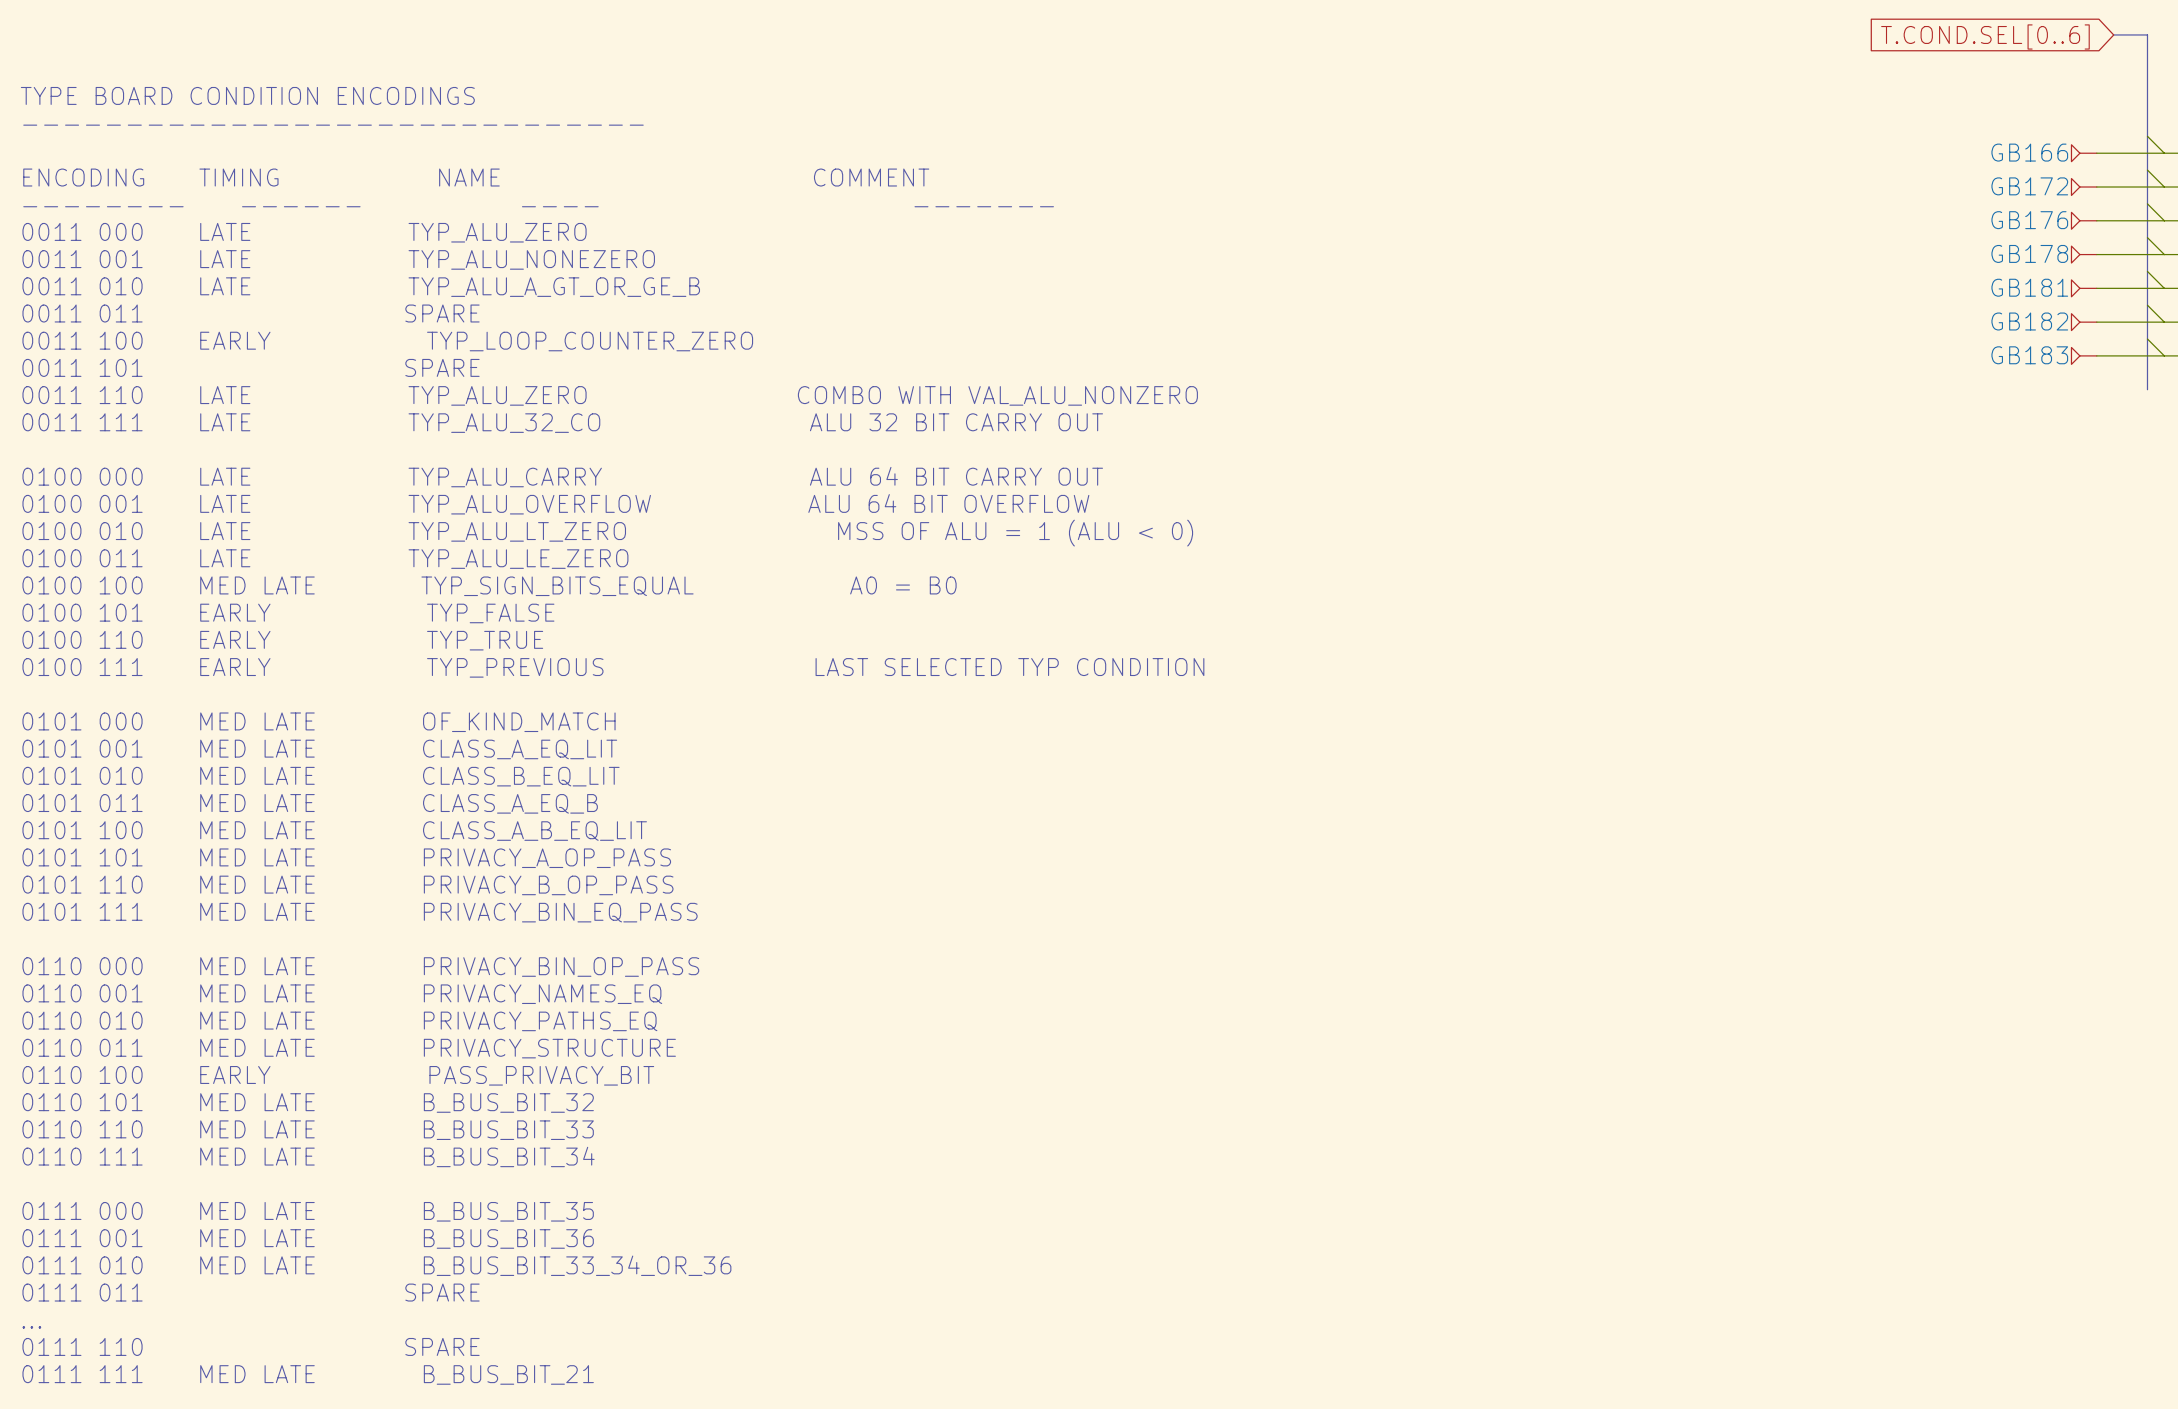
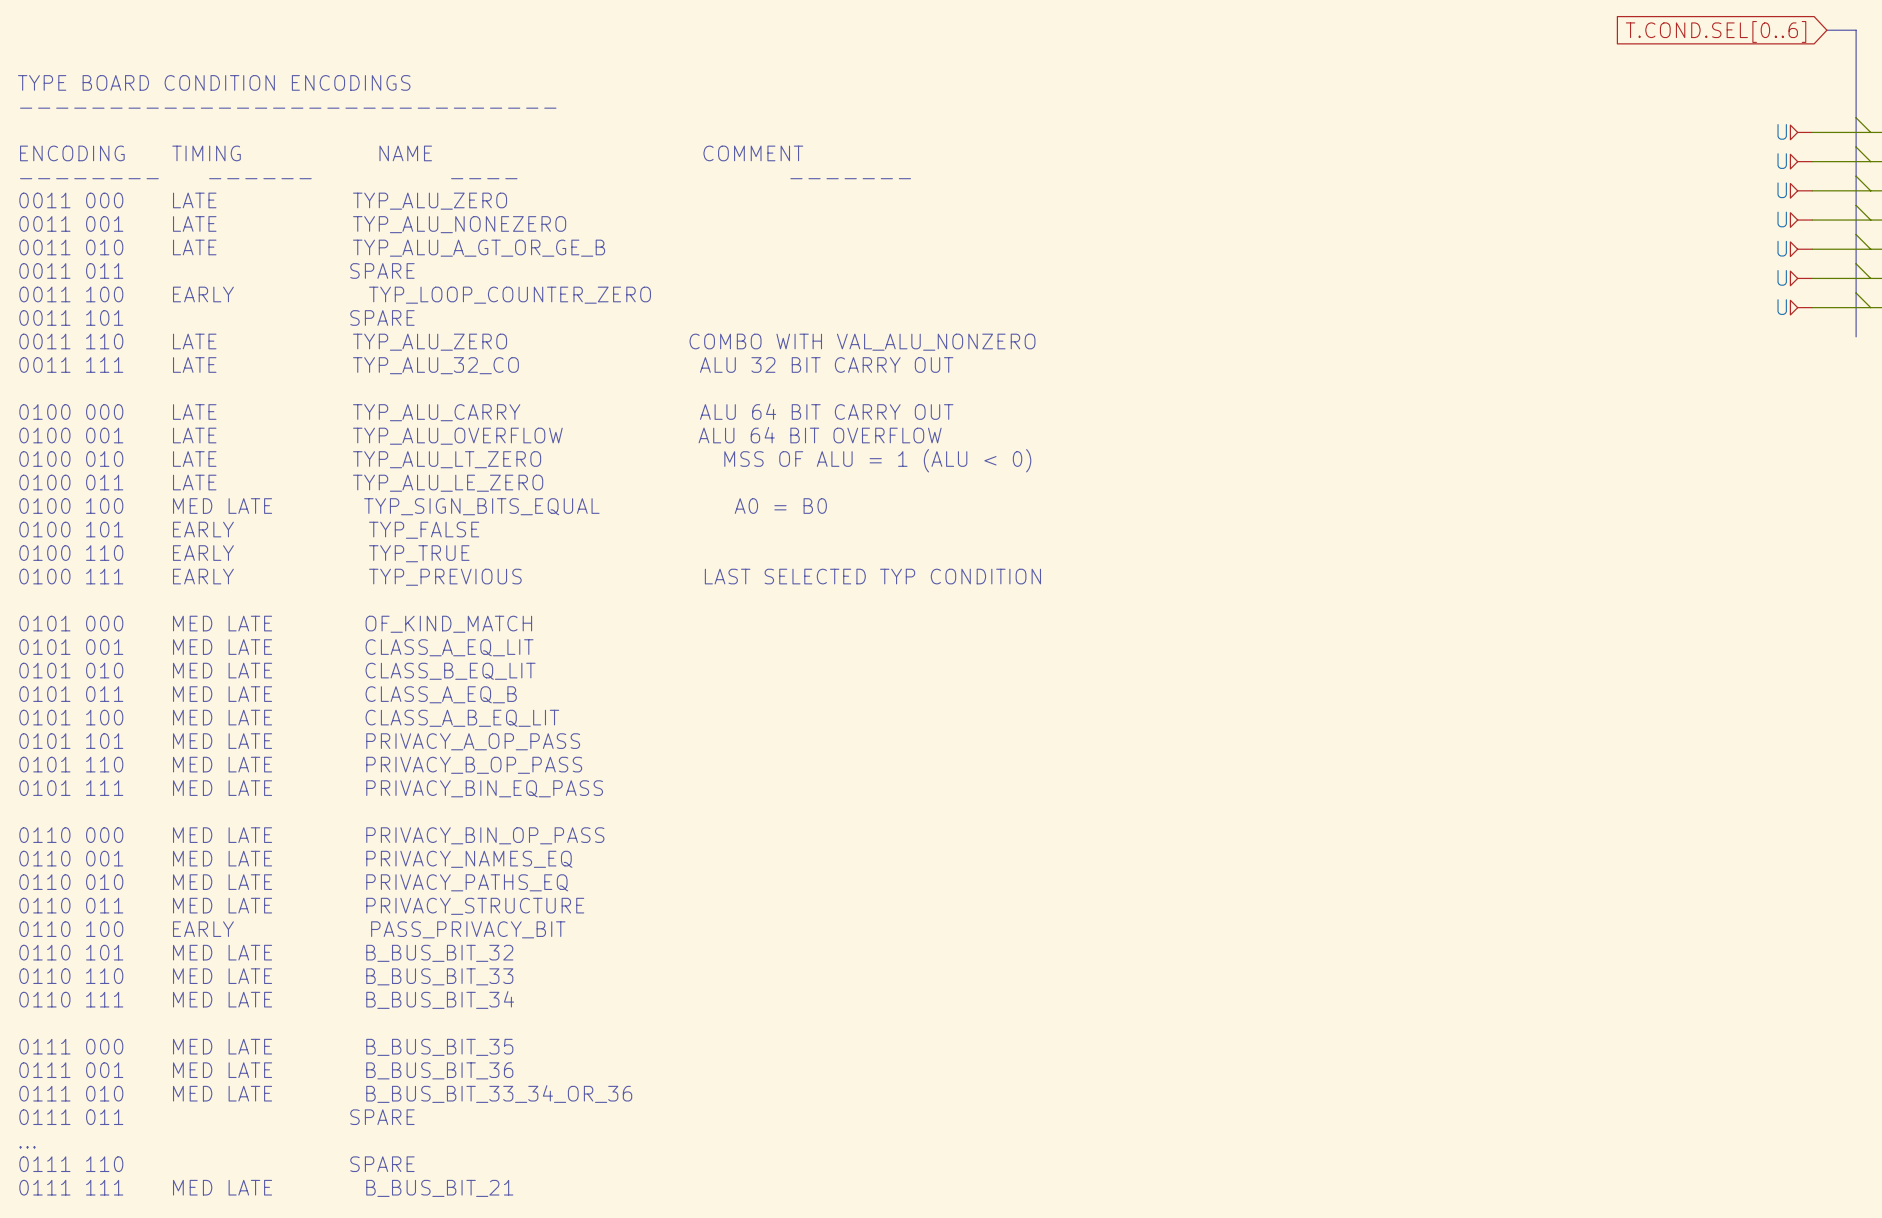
GB166 name: GB166 (2029, 152) -> U (1782, 131)
GB172 name: GB172 (2029, 186) -> U (1782, 161)
GB176 name: GB176 (2029, 220) -> U (1782, 190)
GB178 name: GB178 (2029, 253) -> U (1782, 219)
GB181 name: GB181 (2029, 287) -> U (1782, 248)
GB182 name: GB182 (2029, 321) -> U (1782, 277)
GB183 name: GB183 (2029, 355) -> U (1782, 307)

